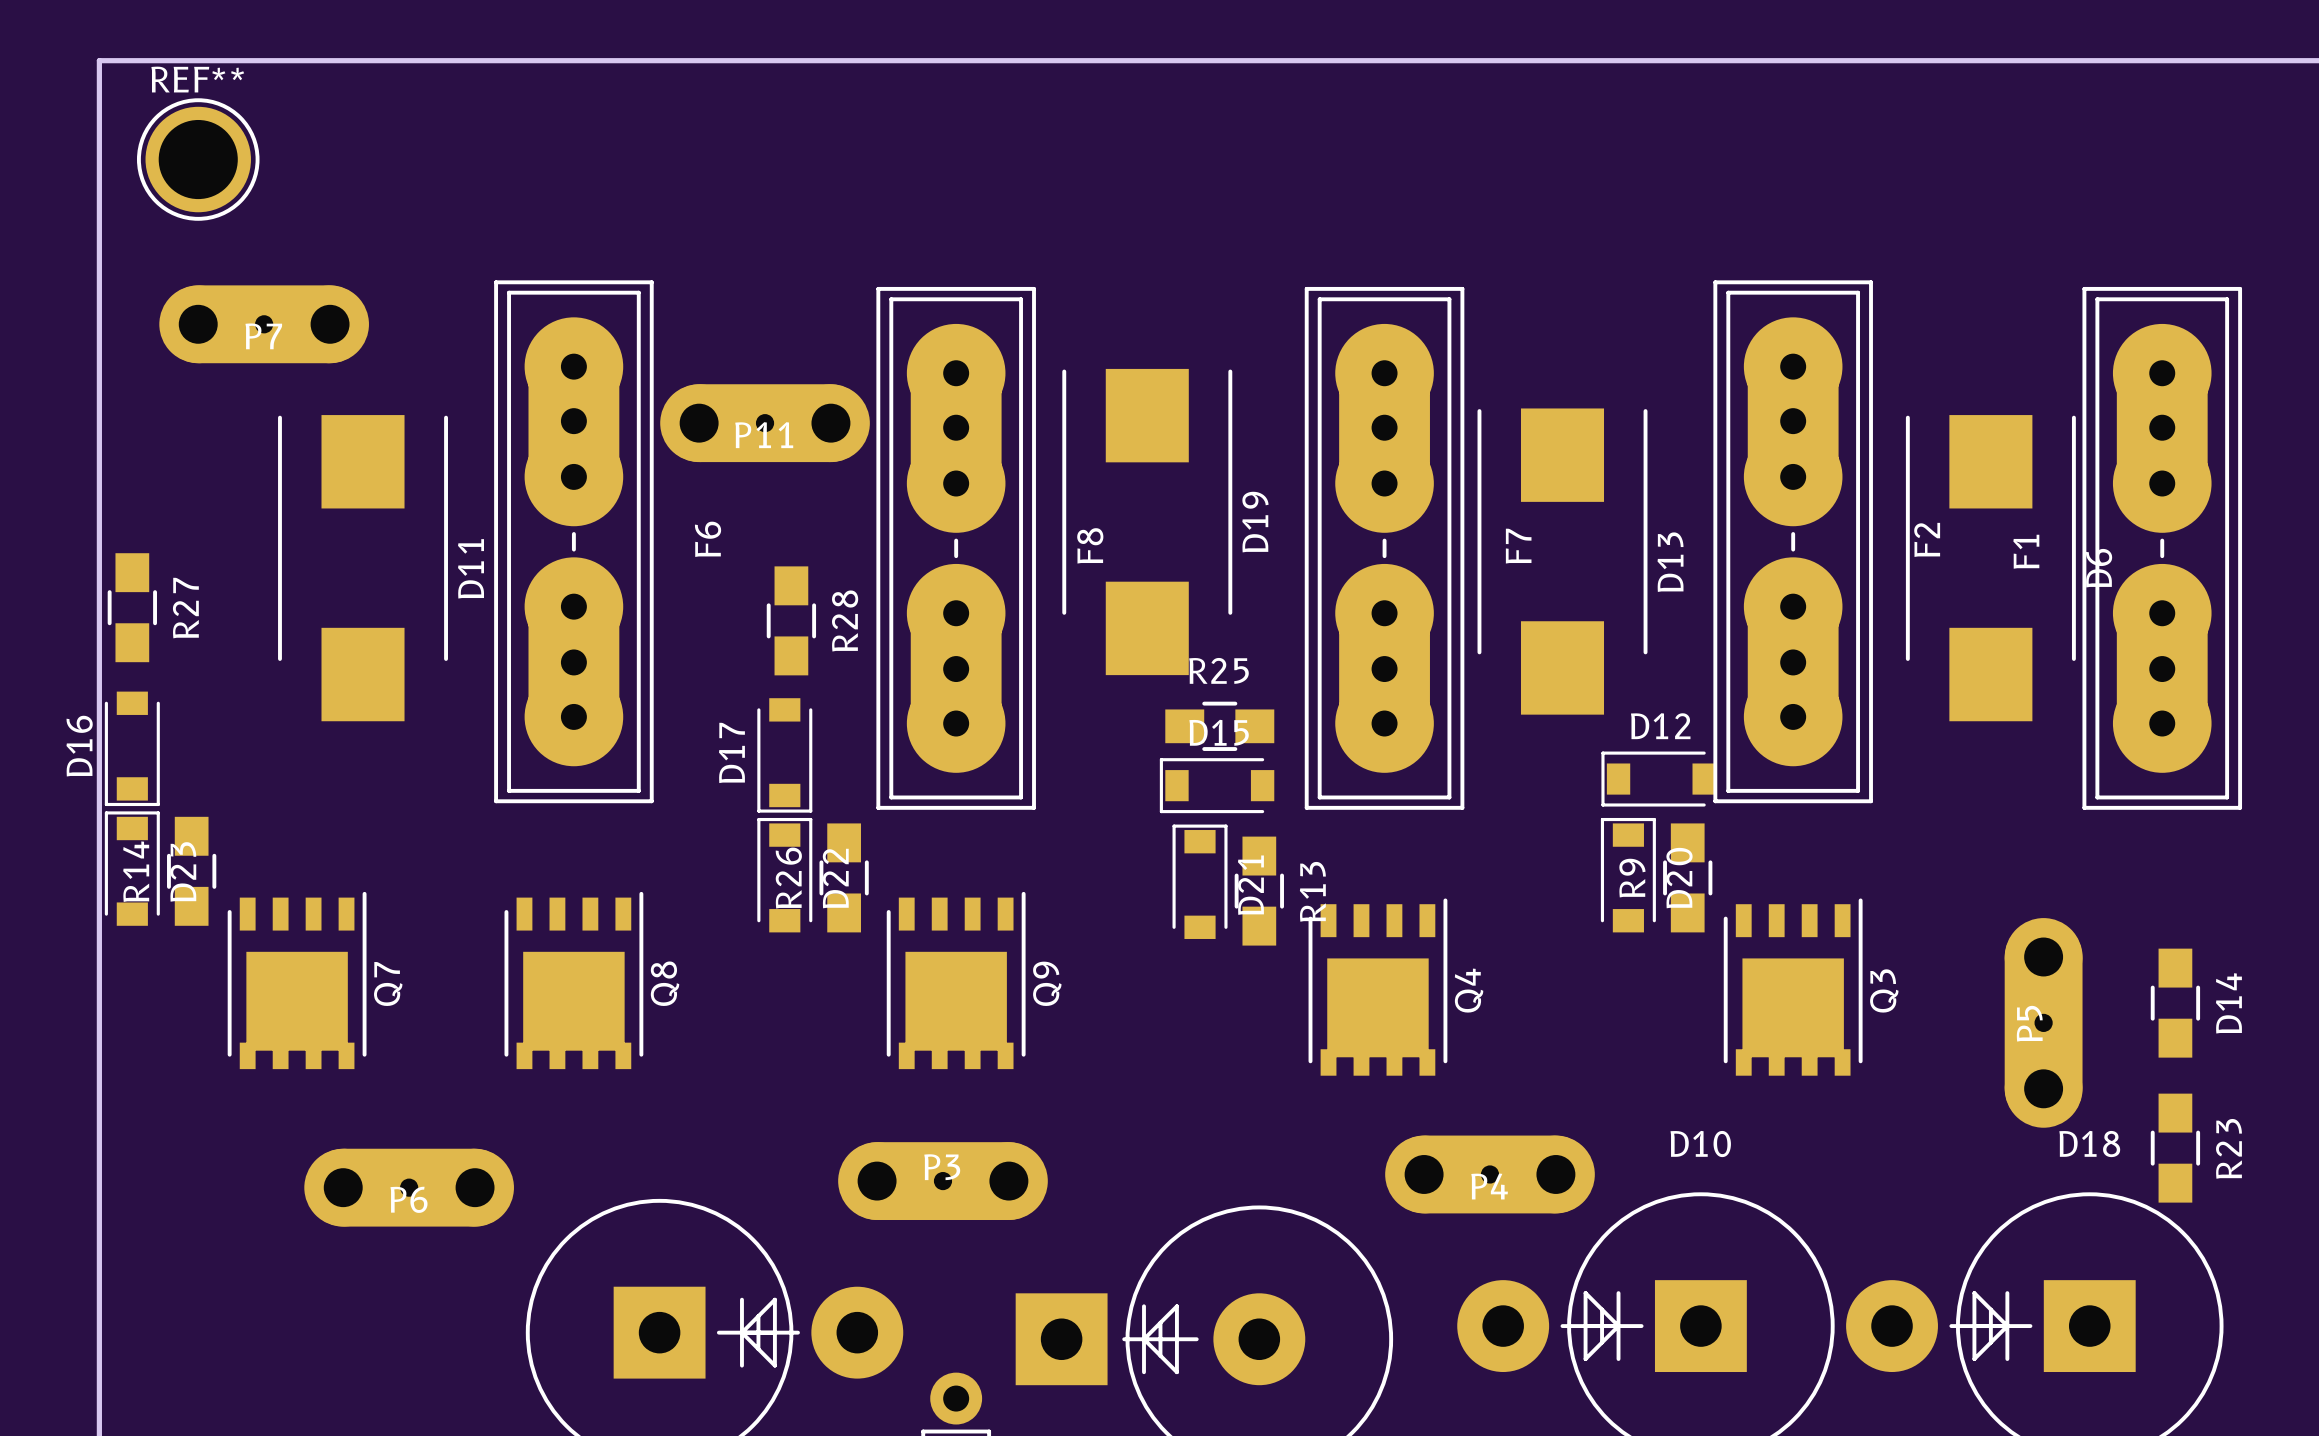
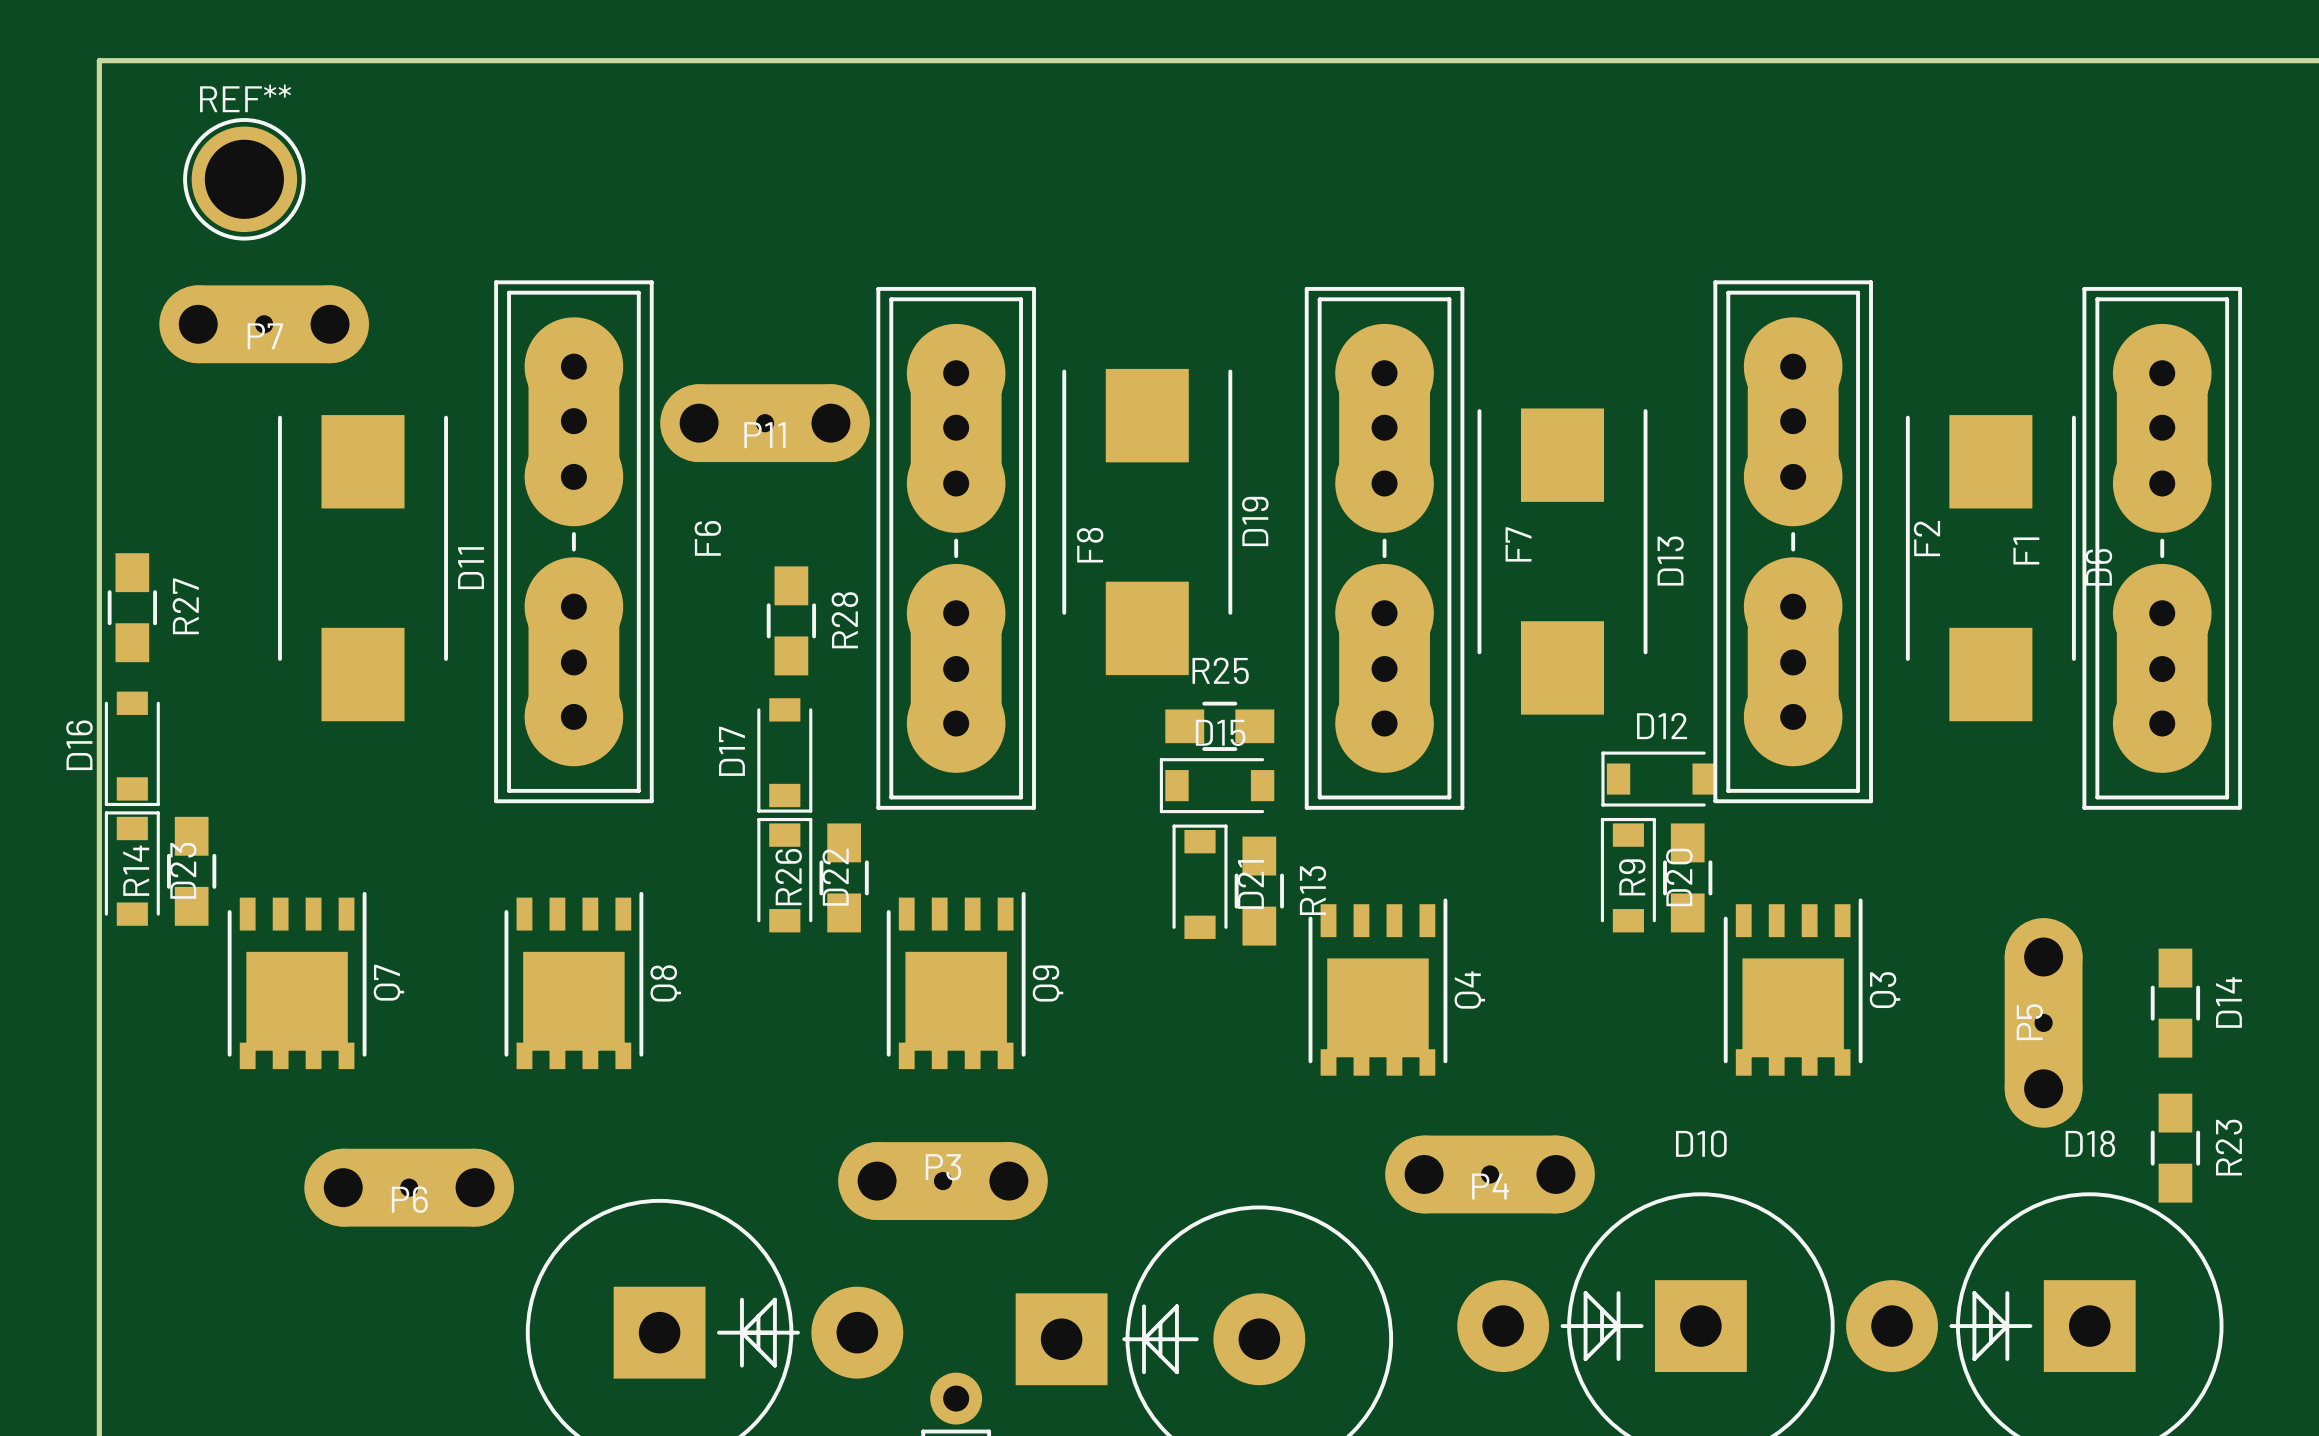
REF** position: (198, 159) -> (244, 179)

